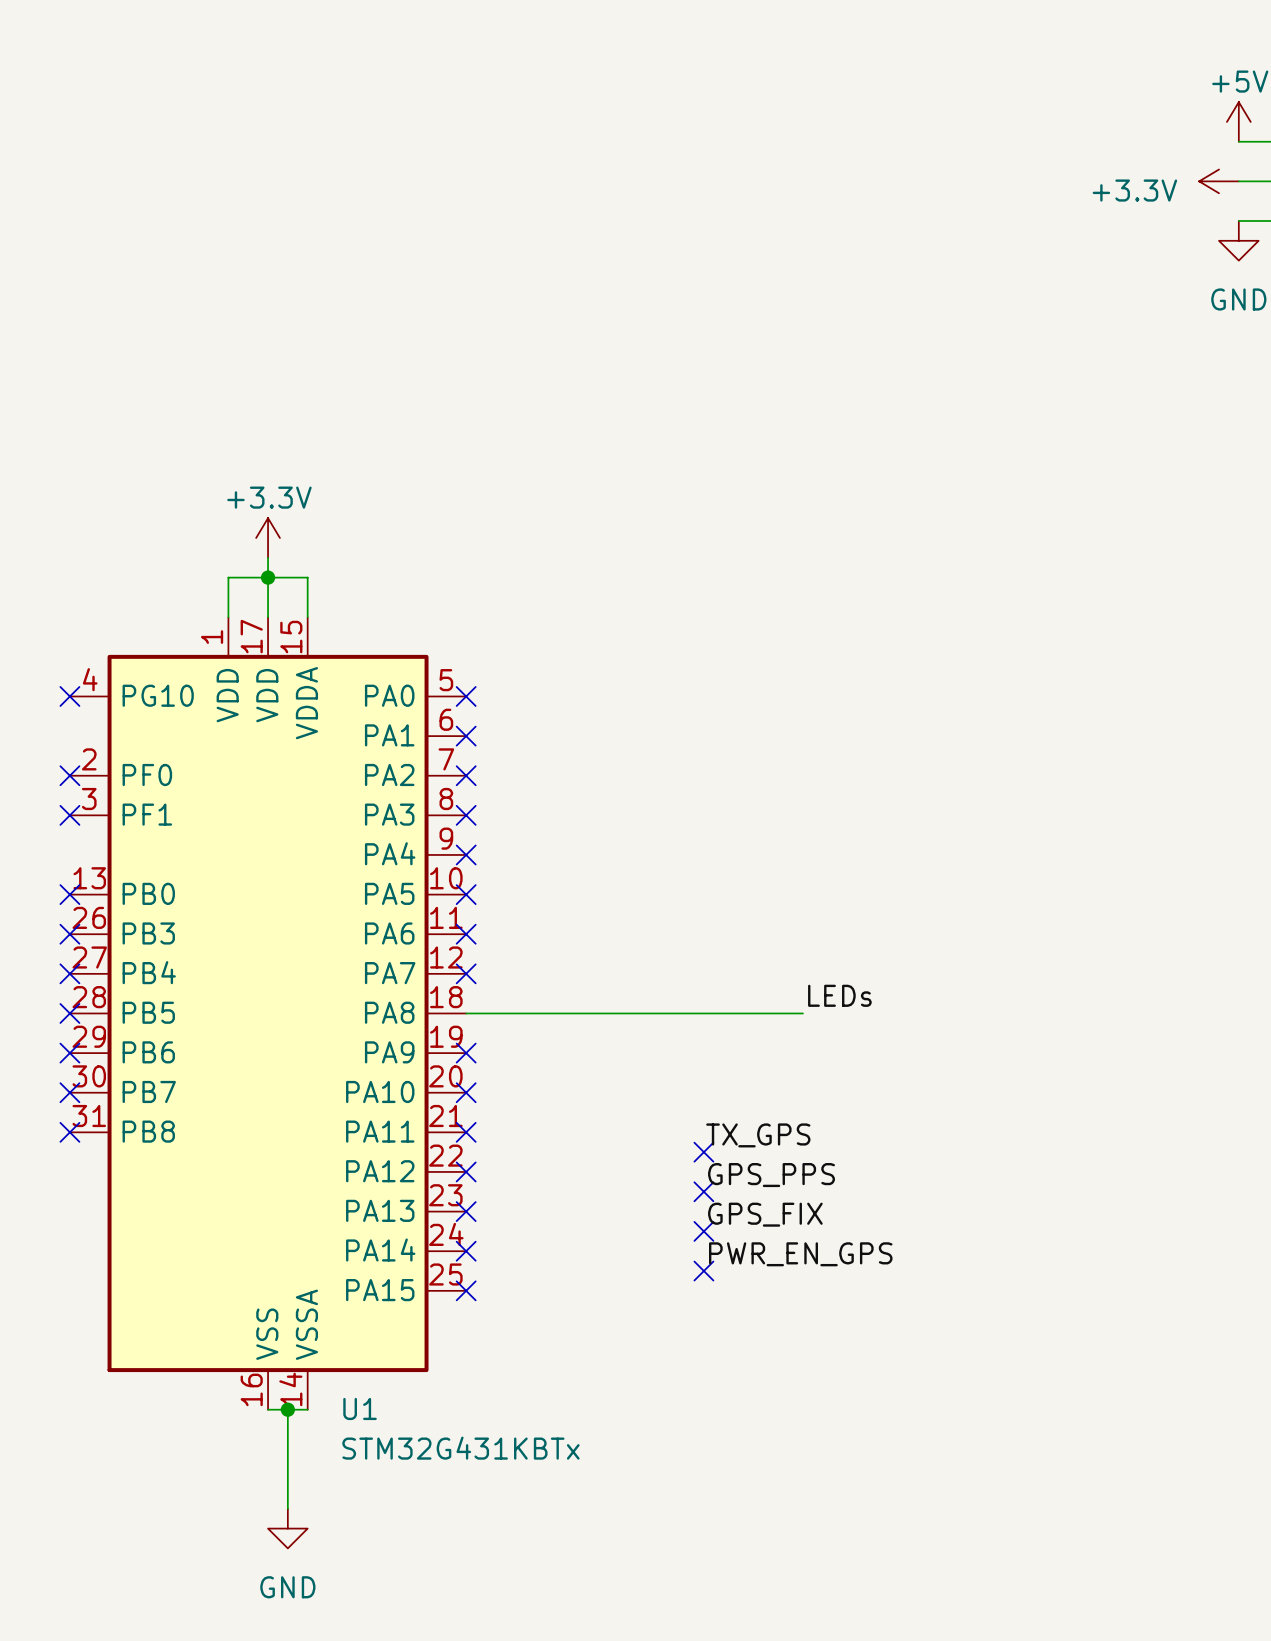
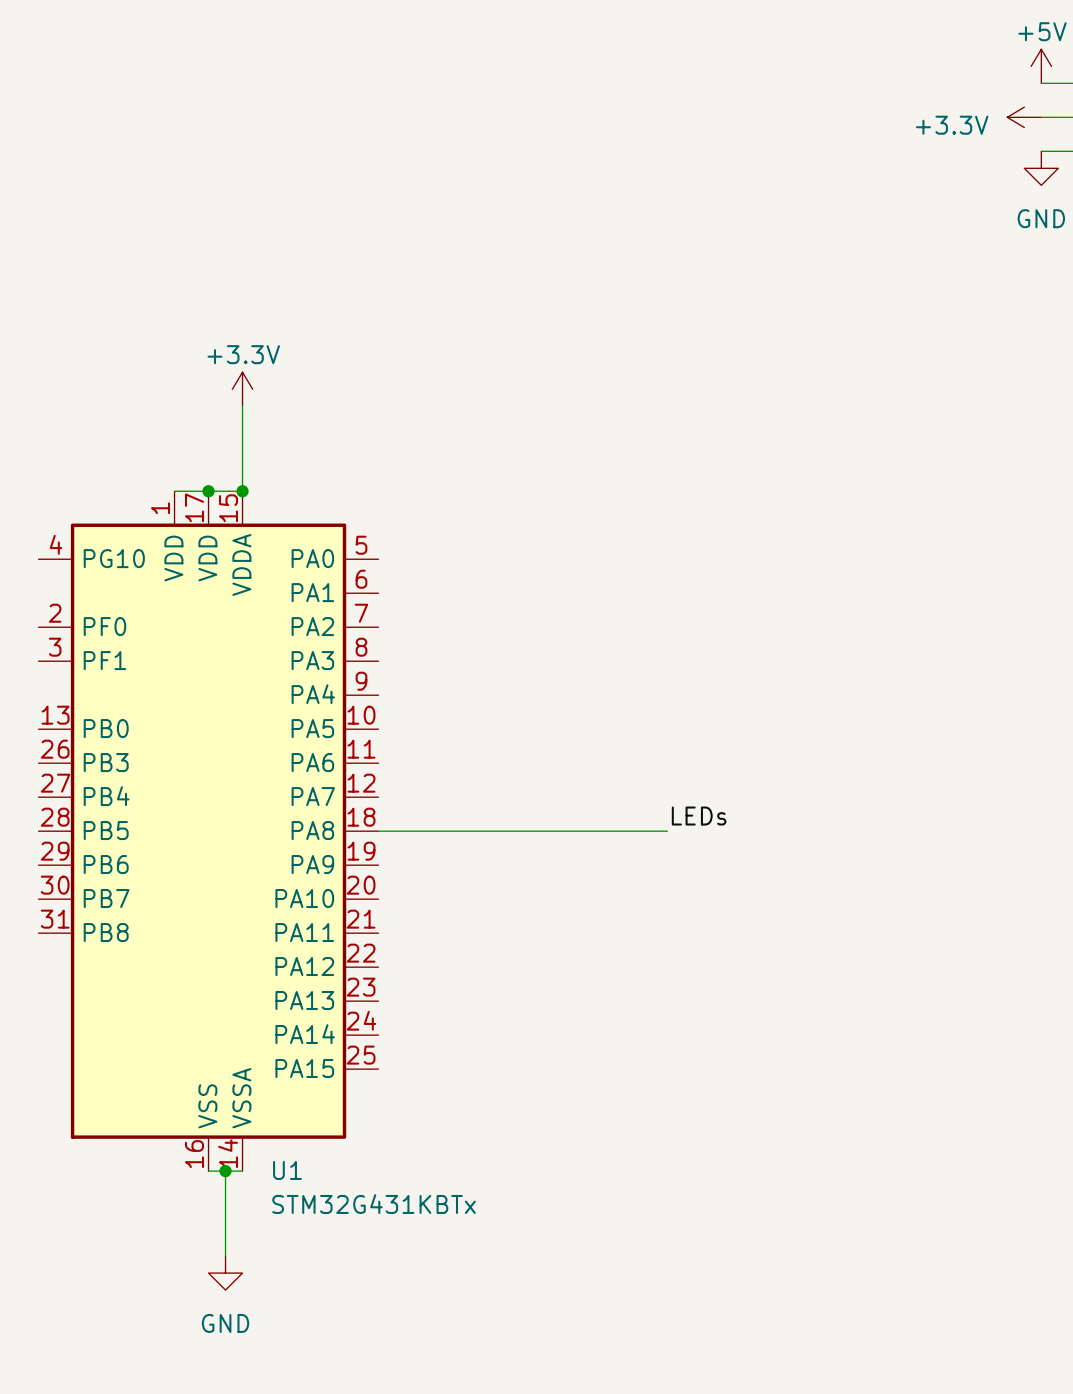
power symbol position: +3.3V (268, 537) -> +3.3V (242, 389)
wire: (268, 557) (268, 617) -> (242, 406) (242, 457)
junction: (268, 577) -> none
wire: (307, 577) (228, 577) (228, 617) -> (242, 491) (174, 491)
junction: none -> (208, 491)
junction: none -> (242, 491)
no-connect mark: (69, 696) -> none
no-connect mark: (466, 696) -> none
no-connect mark: (466, 736) -> none
no-connect mark: (69, 775) -> none
no-connect mark: (466, 775) -> none
no-connect mark: (69, 815) -> none
no-connect mark: (466, 815) -> none
no-connect mark: (466, 854) -> none
no-connect mark: (69, 894) -> none
no-connect mark: (466, 894) -> none
no-connect mark: (69, 934) -> none
no-connect mark: (466, 934) -> none
no-connect mark: (69, 973) -> none
no-connect mark: (466, 973) -> none
no-connect mark: (69, 1013) -> none
no-connect mark: (69, 1053) -> none
no-connect mark: (466, 1053) -> none
no-connect mark: (69, 1092) -> none
no-connect mark: (466, 1092) -> none
no-connect mark: (69, 1132) -> none
no-connect mark: (466, 1132) -> none
label: TX_GPS (758, 1135) -> none
no-connect mark: (703, 1152) -> none
no-connect mark: (466, 1171) -> none
label: GPS_PPS (771, 1175) -> none
no-connect mark: (703, 1191) -> none
no-connect mark: (466, 1211) -> none
label: GPS_FIX (765, 1214) -> none
no-connect mark: (703, 1231) -> none
no-connect mark: (466, 1251) -> none
label: PWR_EN_GPS (800, 1254) -> none
no-connect mark: (703, 1271) -> none
no-connect mark: (466, 1290) -> none

